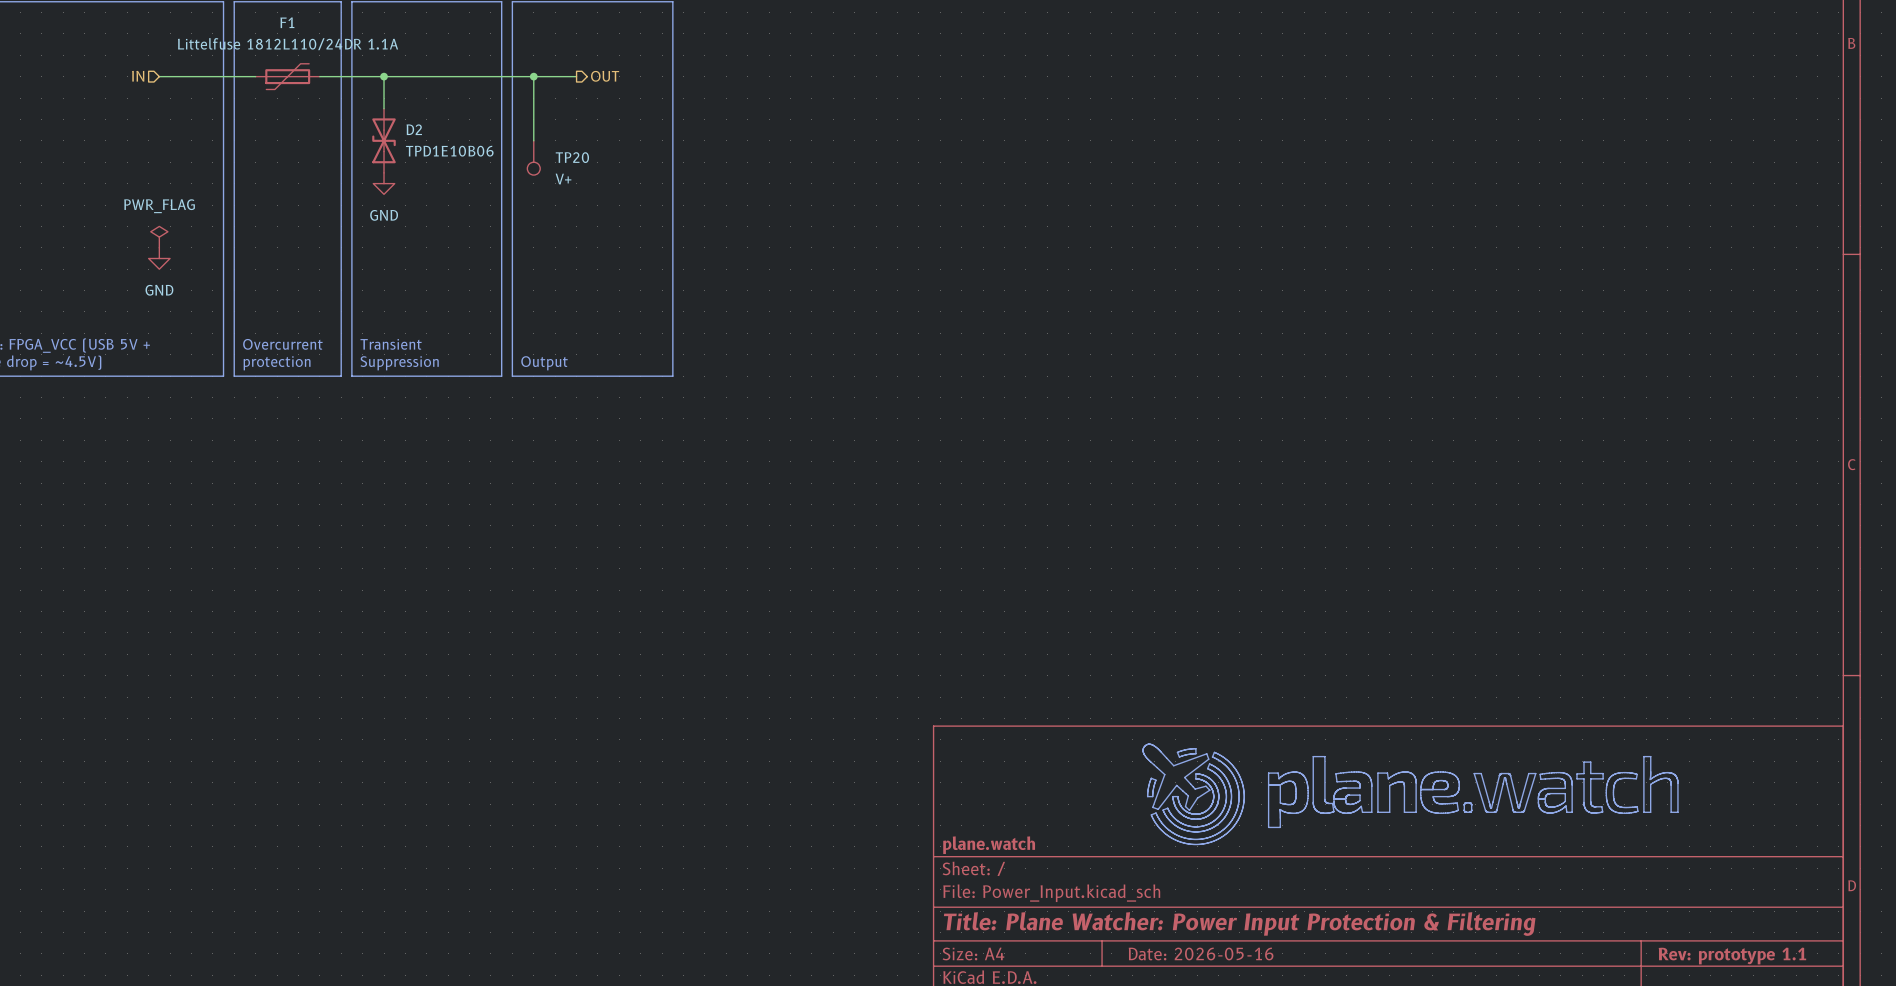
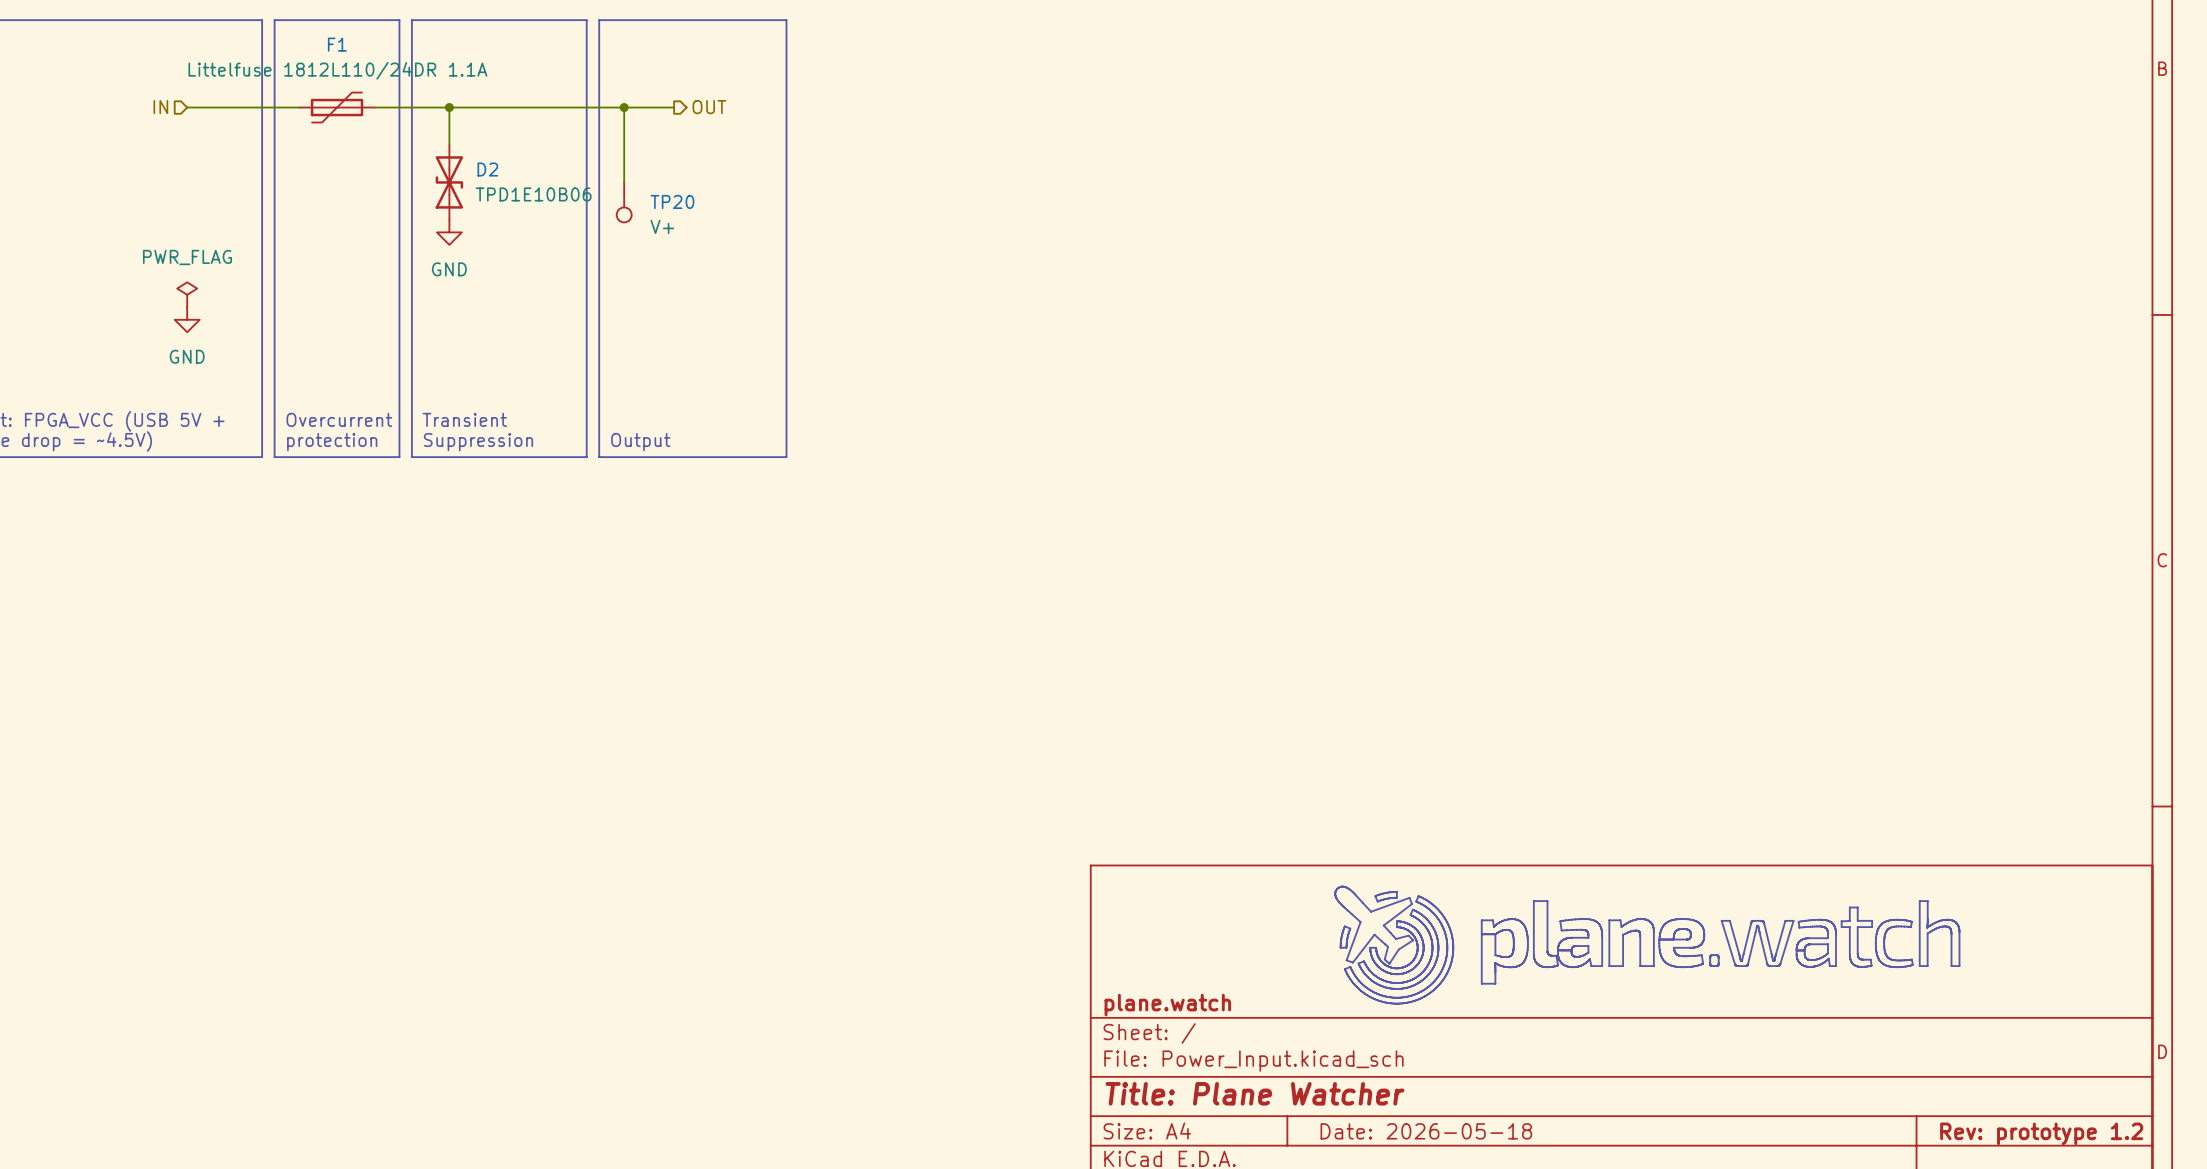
title block: Title: Plane Watcher: Power Input Protection & Filtering (1239, 924) -> Title: Plane Watcher (1255, 1093)
title block: Date: 2026-05-16 (1201, 953) -> Date: 2026-05-18 (1426, 1131)
title block: Rev: prototype 1.1 (1732, 955) -> Rev: prototype 1.2 (2041, 1133)

